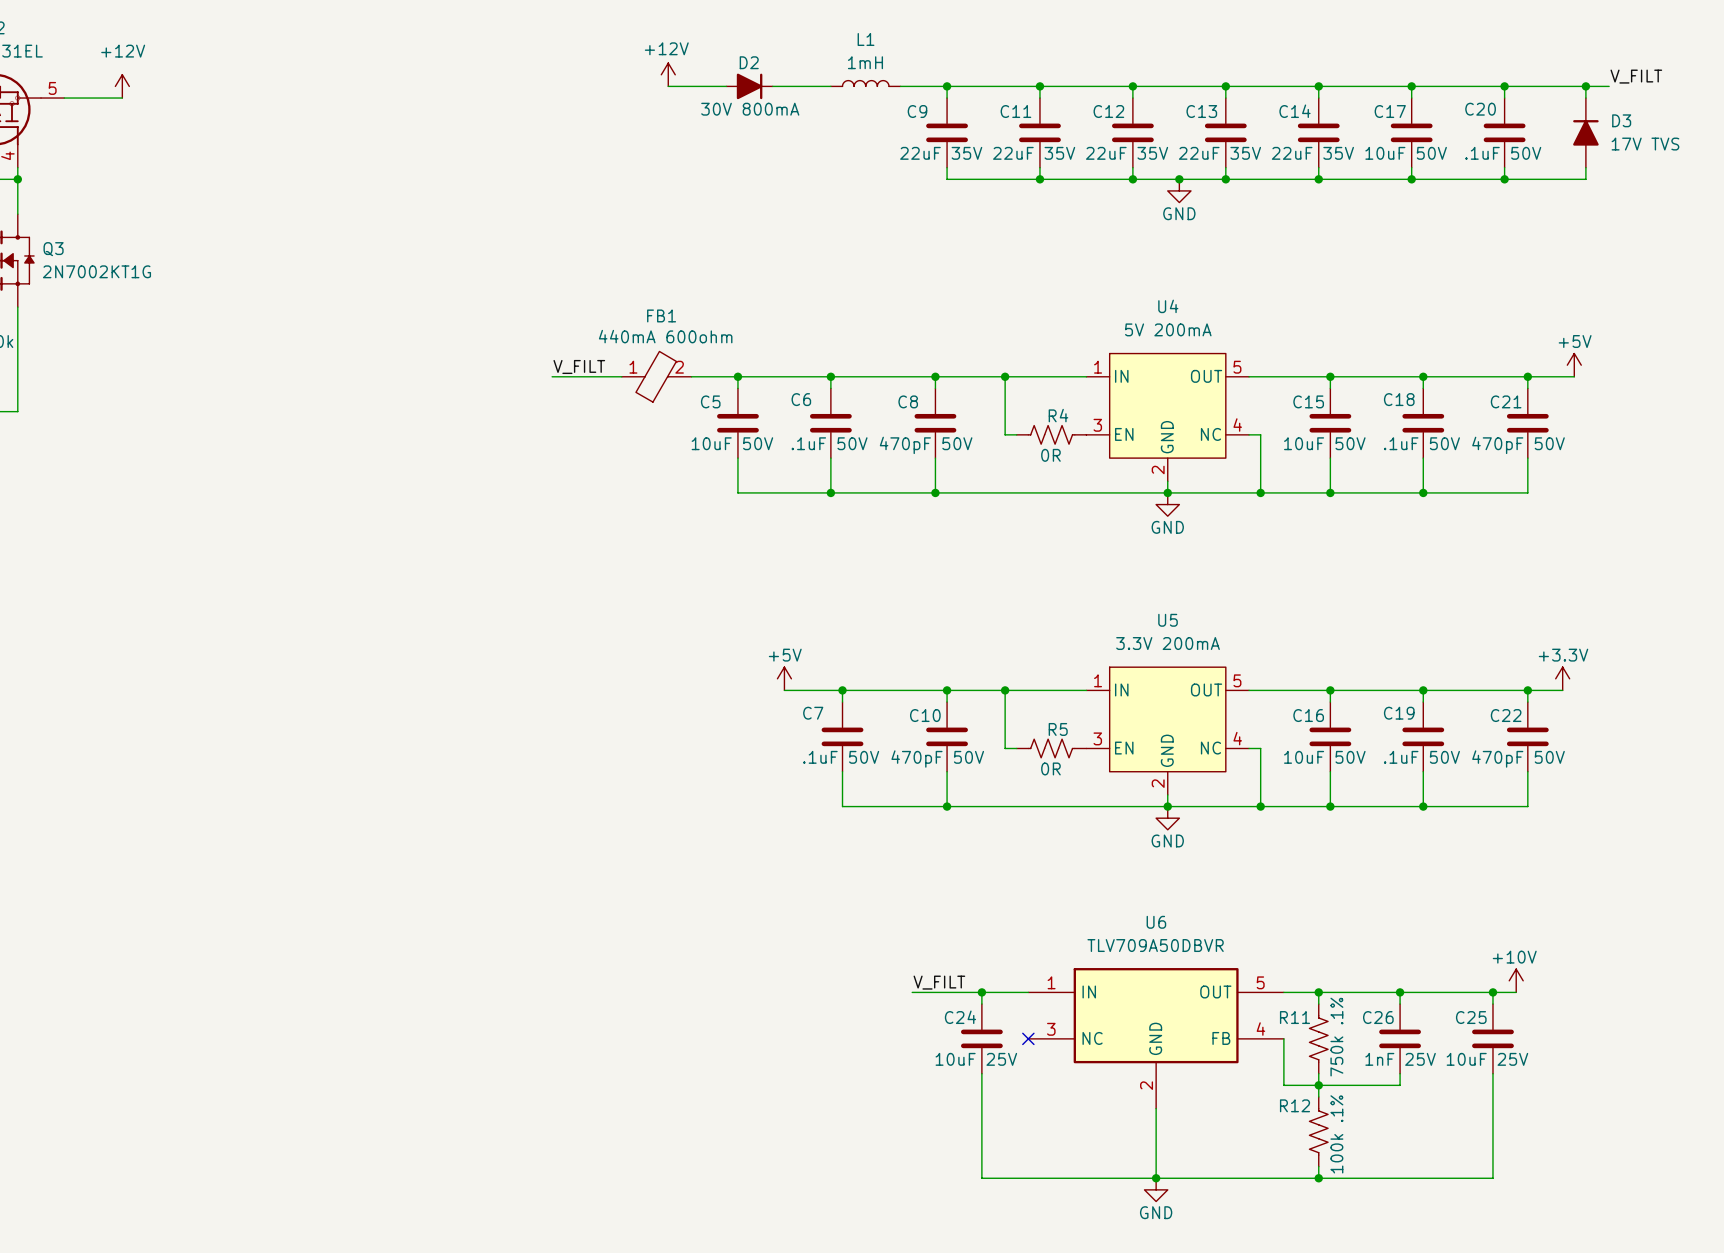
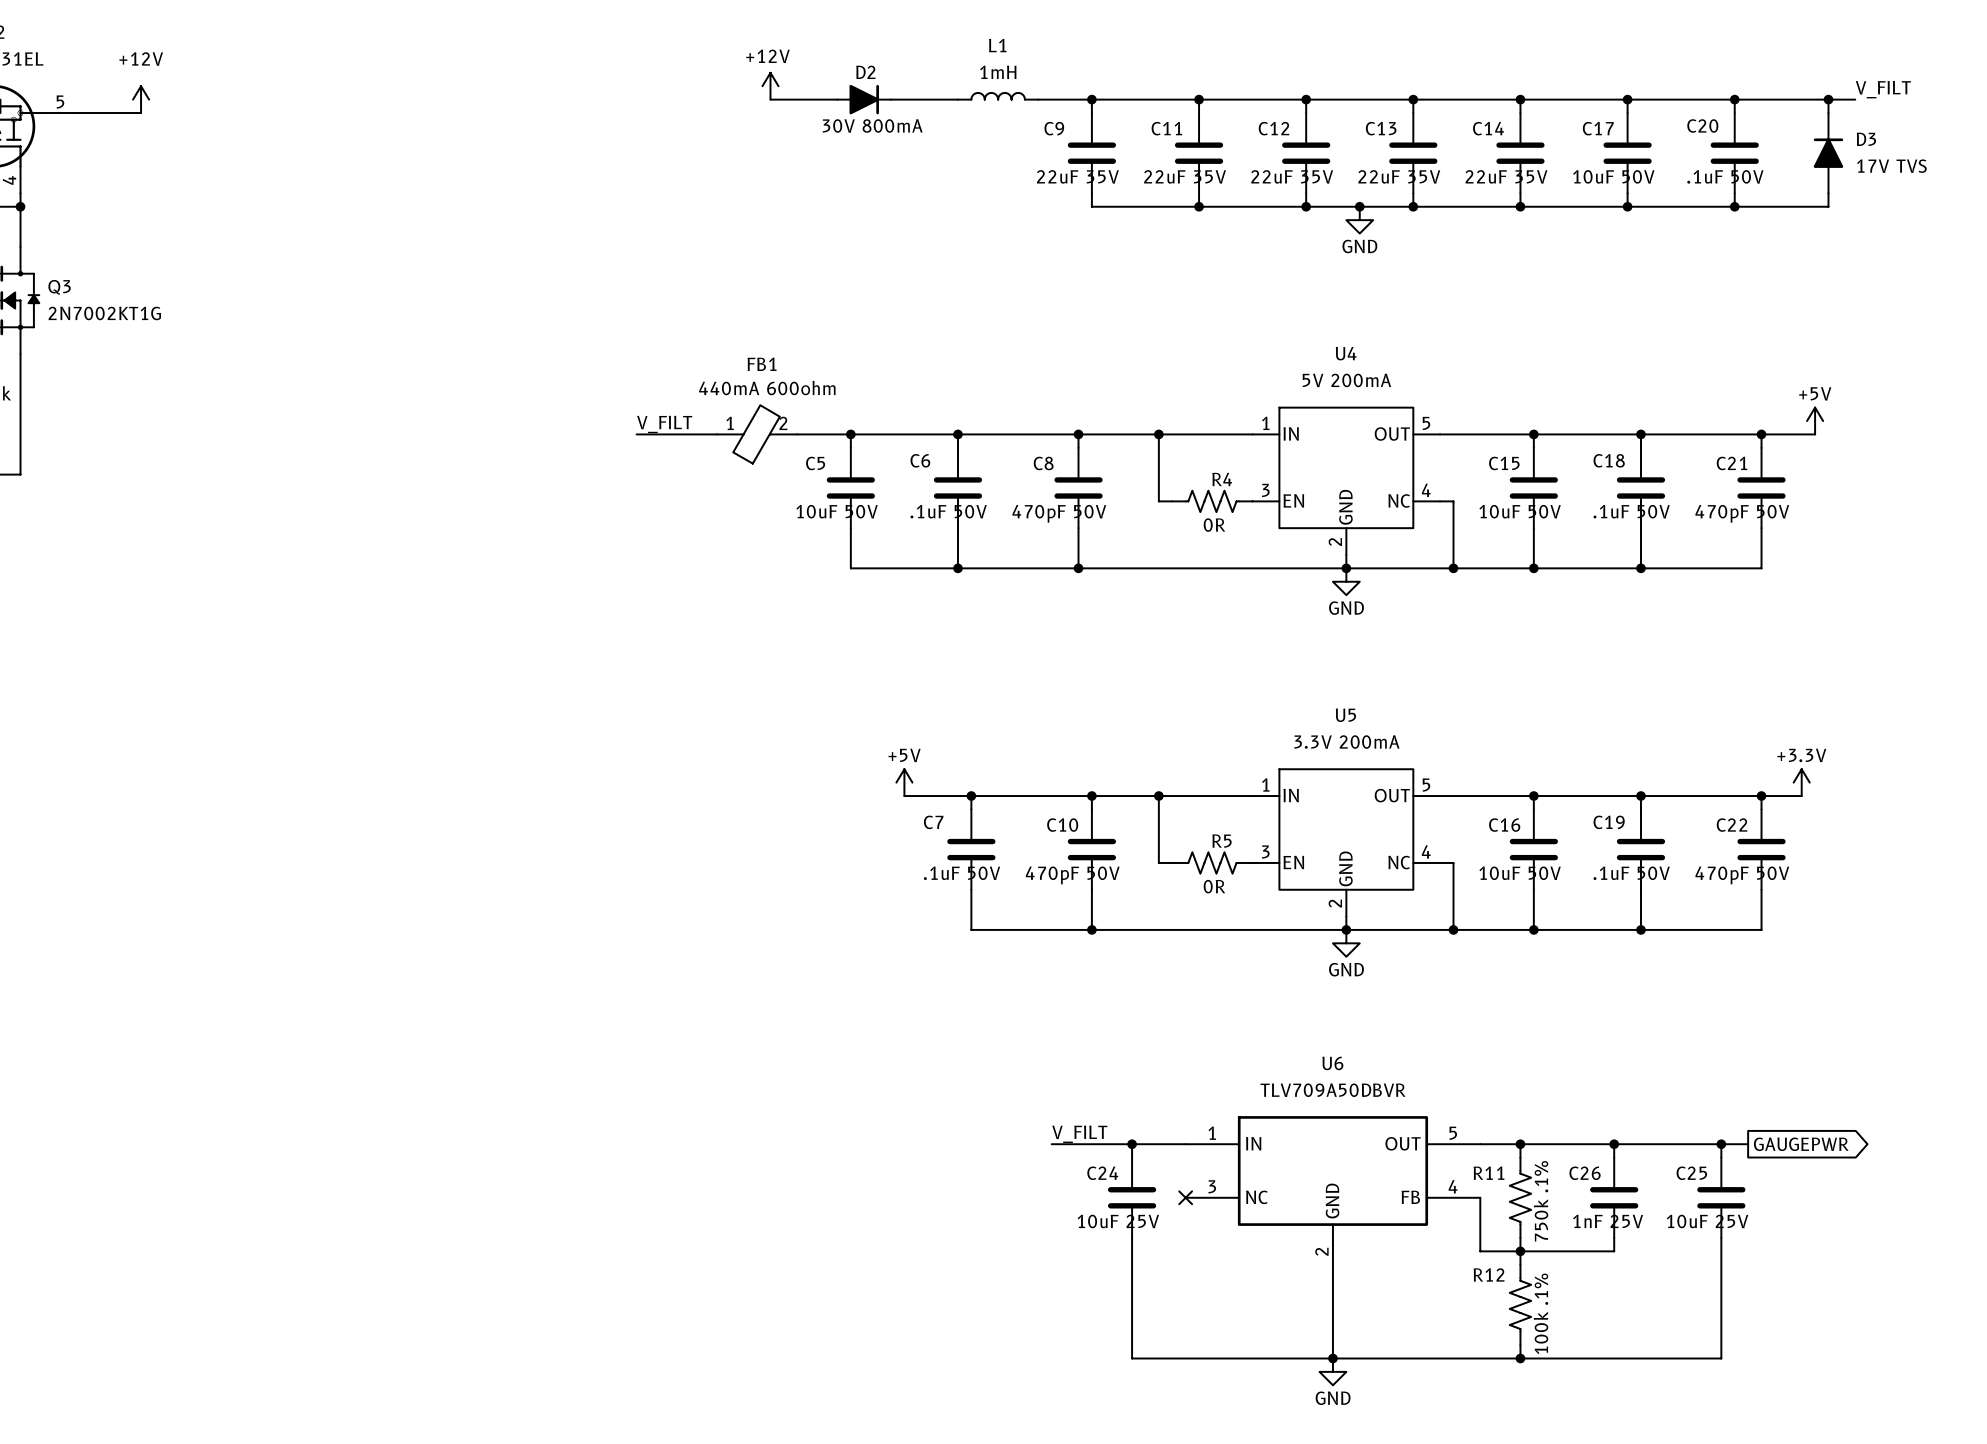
power symbol: +10V (1516, 980) -> none
global label: none -> GAUGEPWR (1801, 1144)

